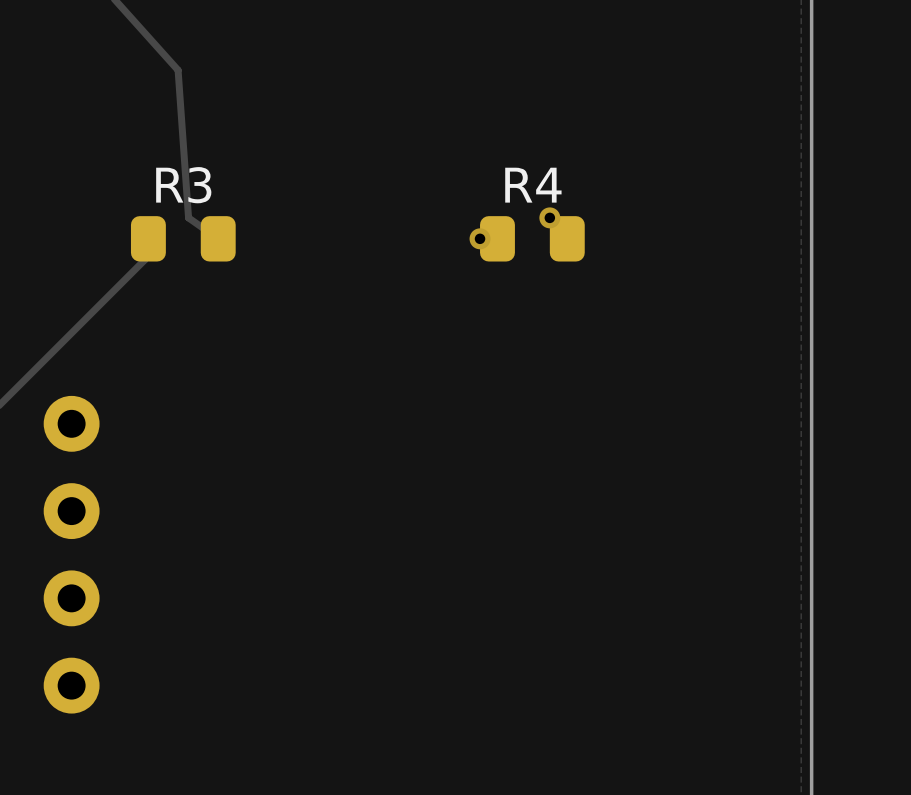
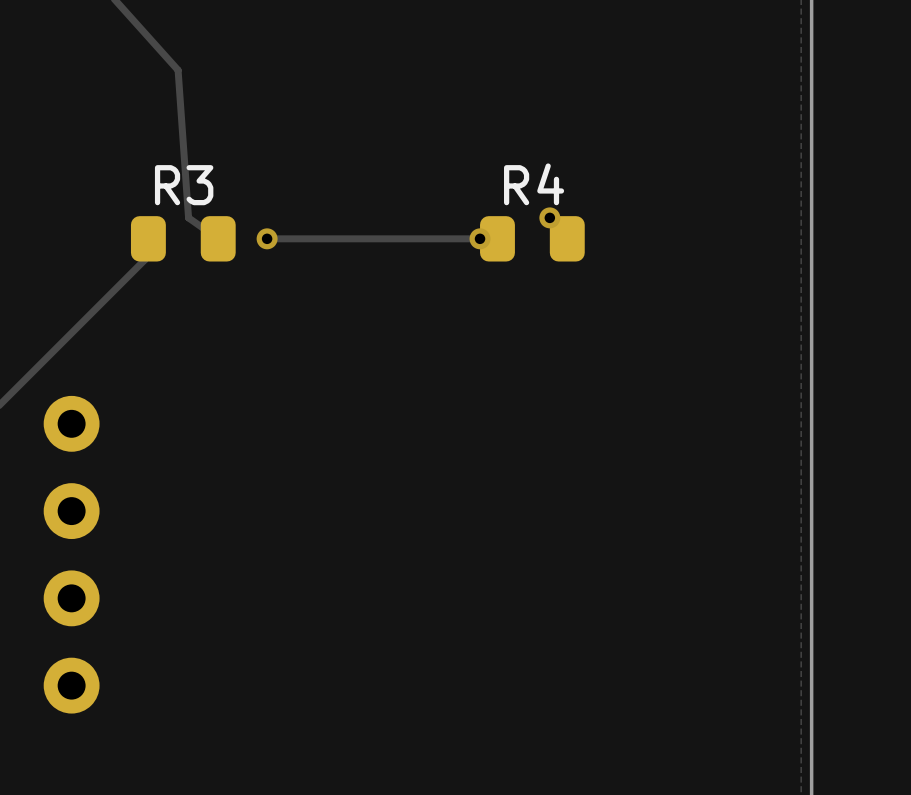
track: none -> (267, 238) (497, 238)
via: none -> (267, 238)

